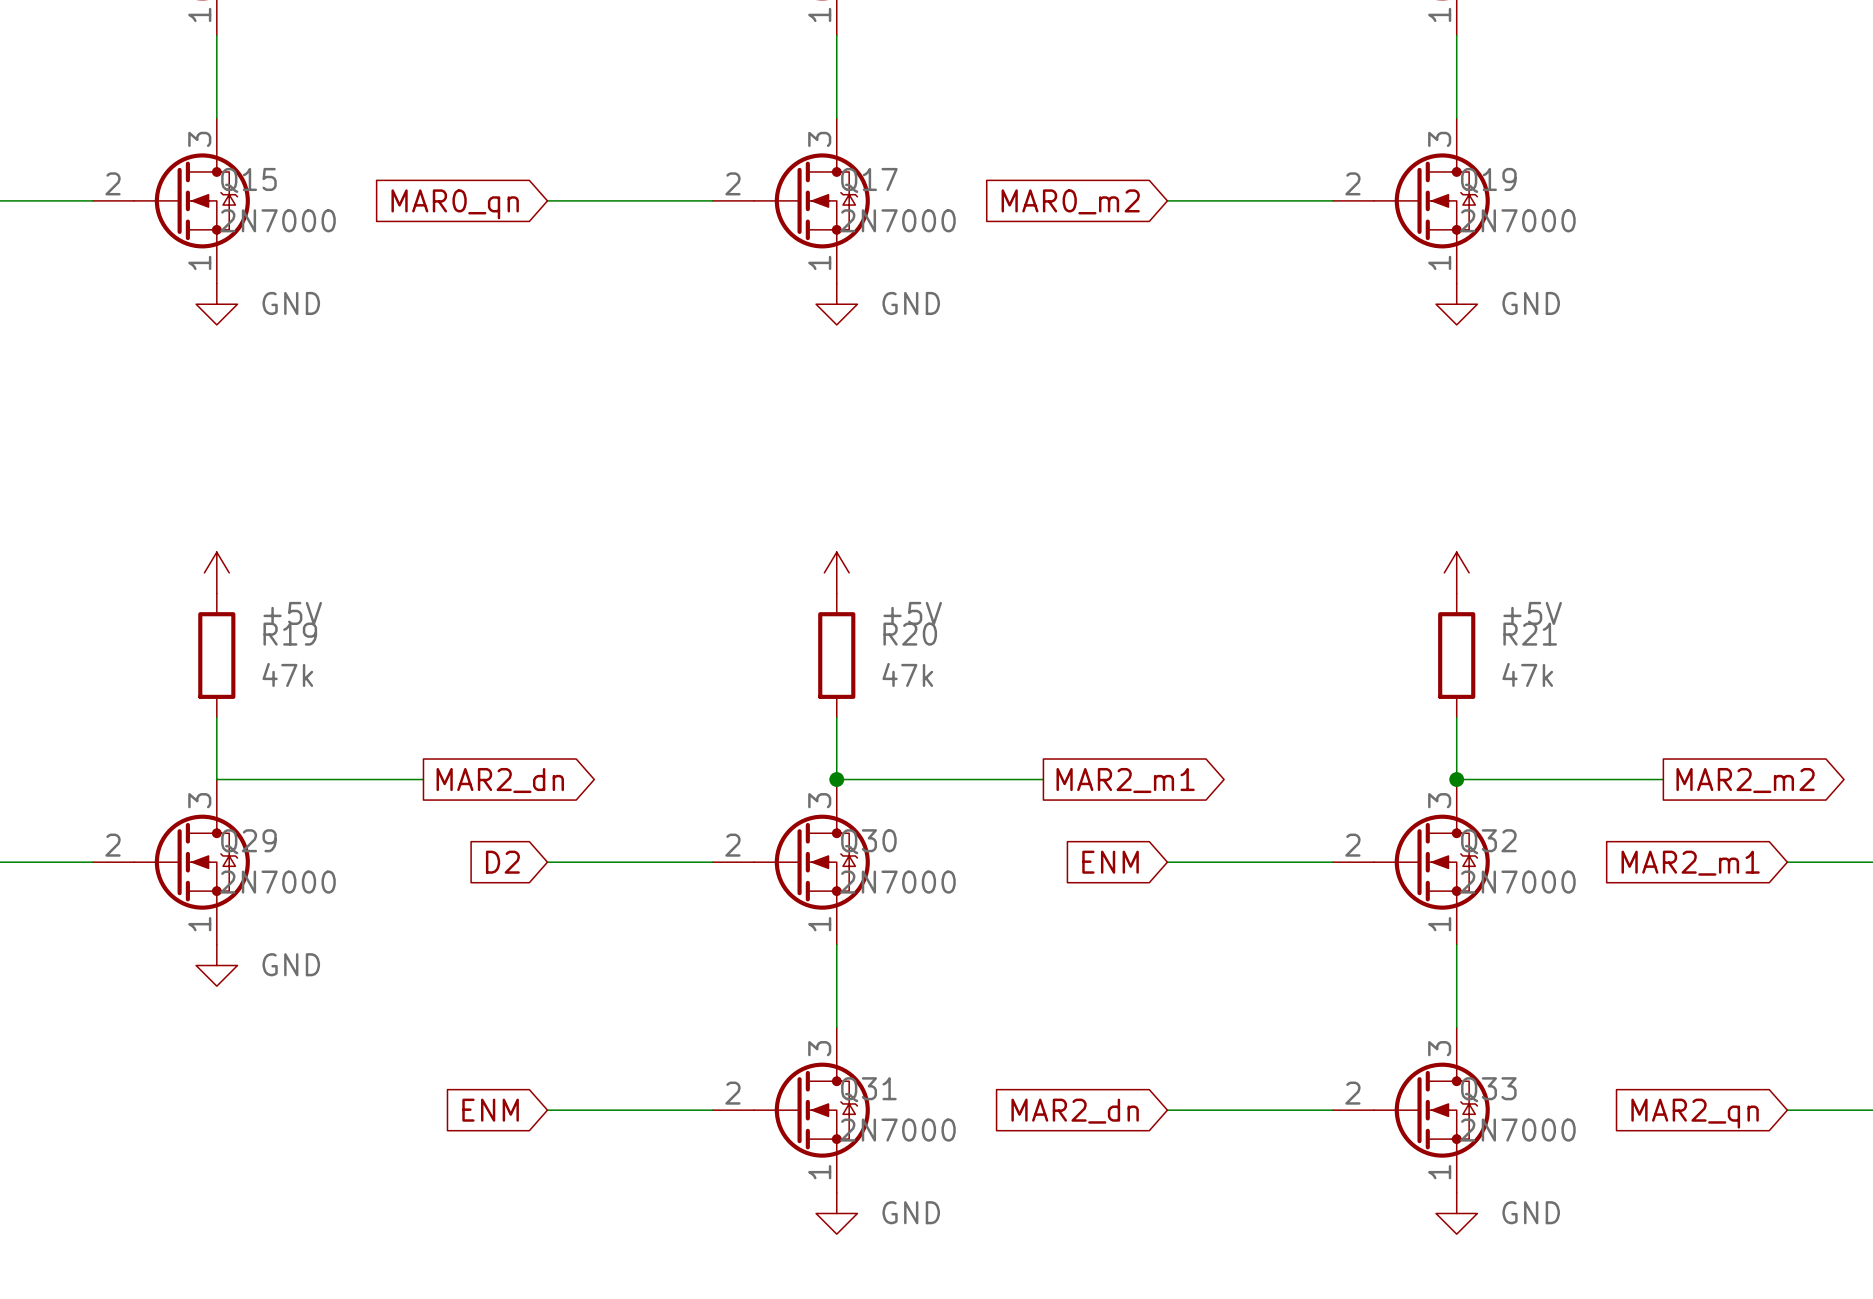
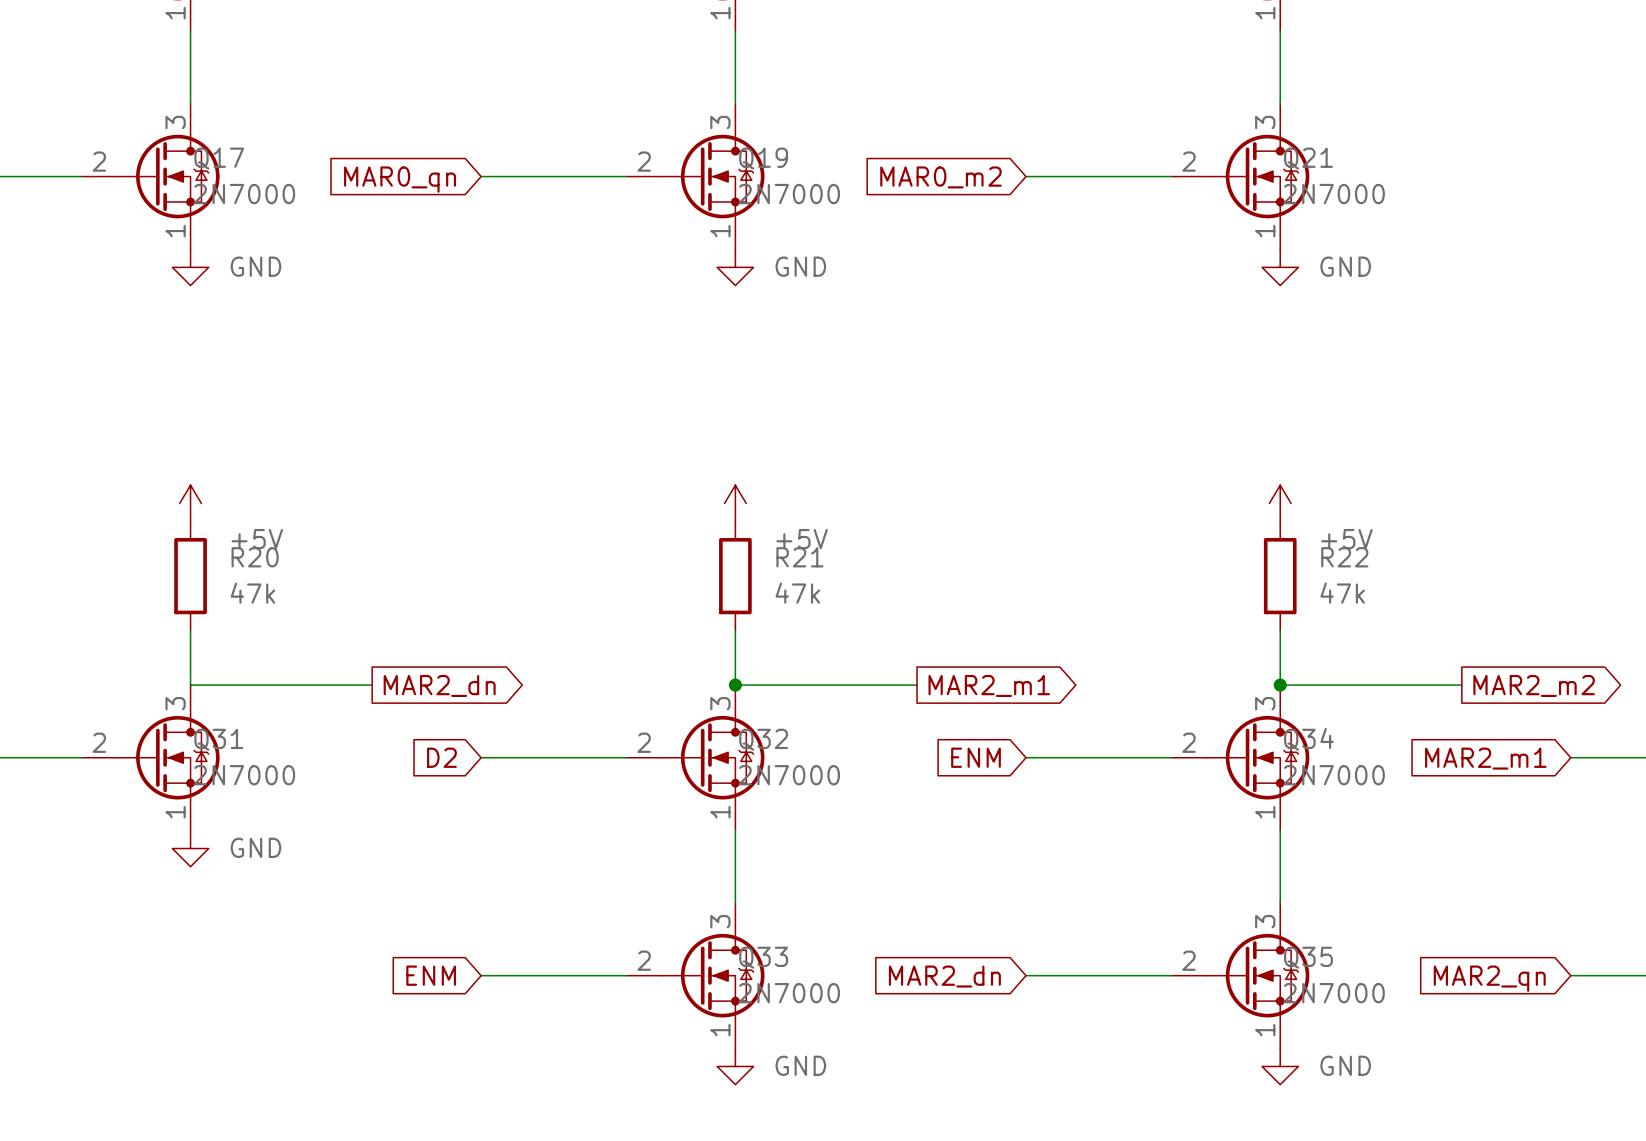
Q15 name: Q15 (248, 180) -> Q17 (219, 158)
Q17 name: Q17 (869, 180) -> Q19 (763, 158)
Q19 name: Q19 (1488, 180) -> Q21 (1308, 158)
R19 name: R19 (290, 634) -> R20 (255, 557)
R20 name: R20 (910, 634) -> R21 (799, 557)
R21 name: R21 (1530, 634) -> R22 (1344, 557)
Q29 name: Q29 (248, 841) -> Q31 (218, 739)
Q30 name: Q30 (868, 841) -> Q32 (763, 739)
Q32 name: Q32 (1488, 841) -> Q34 (1308, 739)
Q31 name: Q31 (868, 1089) -> Q33 (763, 957)
Q33 name: Q33 (1488, 1089) -> Q35 (1308, 957)

